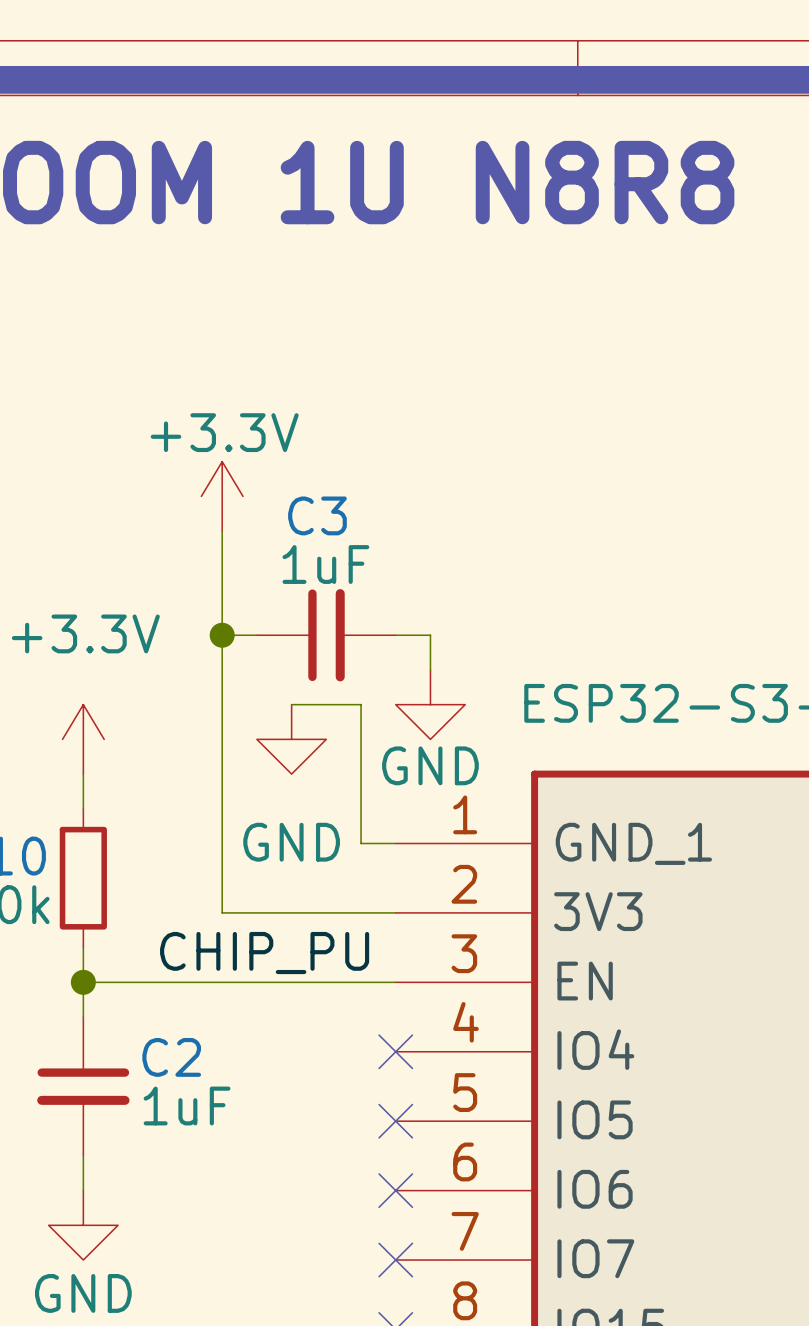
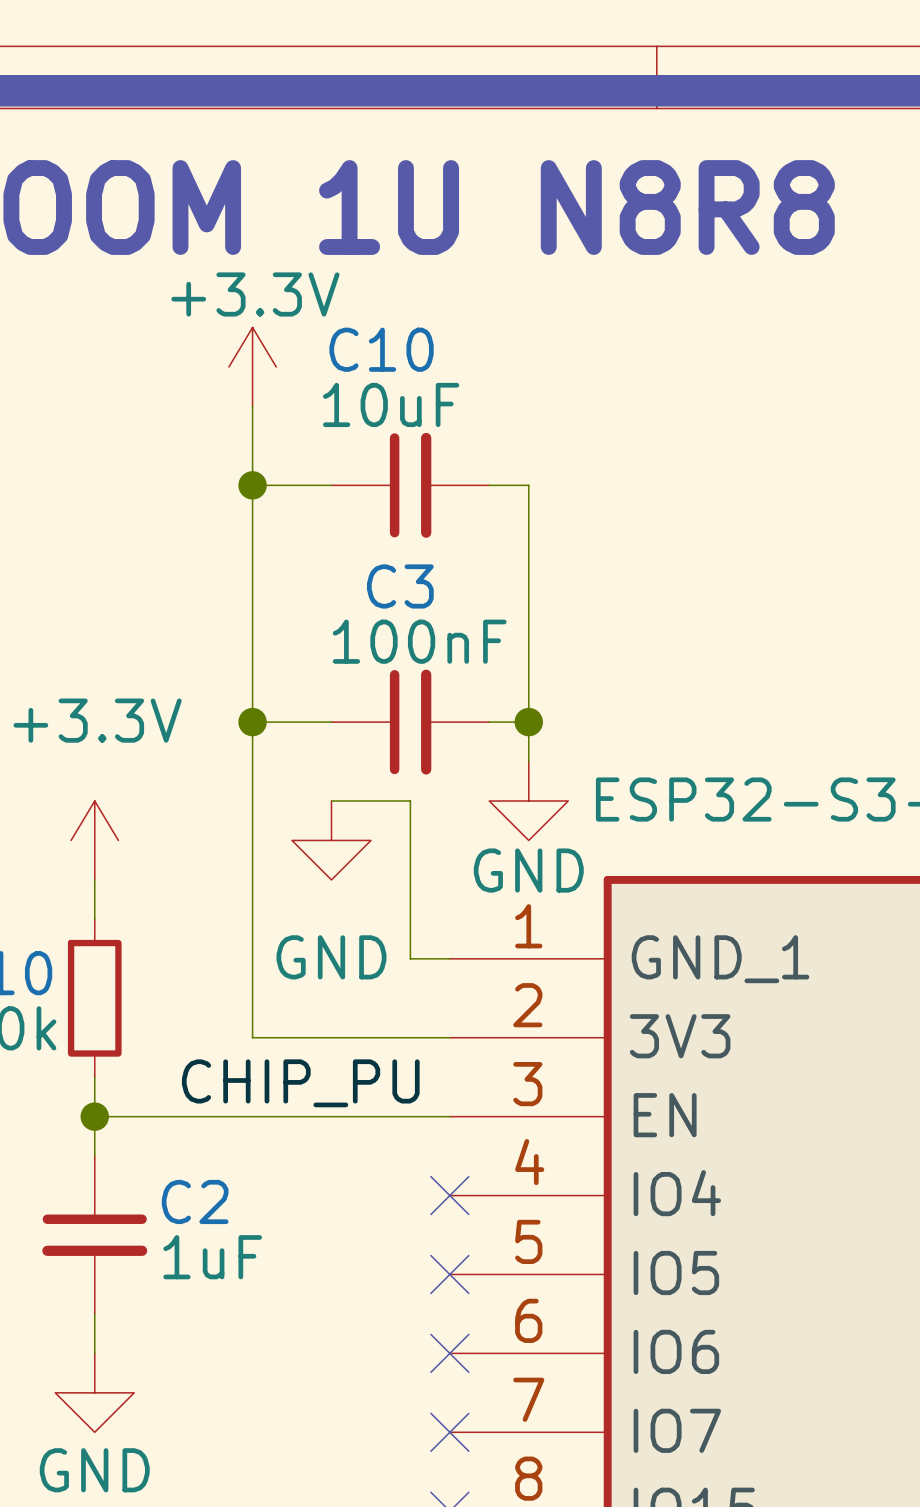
wire: none -> (252, 406) (252, 603)
wire: none -> (252, 485) (331, 485)
junction: none -> (252, 485)
C10: none -> 10uF (410, 485)
wire: none -> (489, 485) (528, 485) (528, 761)
power symbol position: +3.3V (222, 496) -> +3.3V (252, 366)
C3 value: 1uF (325, 564) -> 100nF (419, 641)
C3 position: (326, 635) -> (410, 722)
wire: (395, 635) (430, 635) (430, 669) -> none
wire: none -> (489, 722) (528, 722)
junction: none -> (528, 722)
power symbol position: GND (430, 704) -> GND (528, 801)

